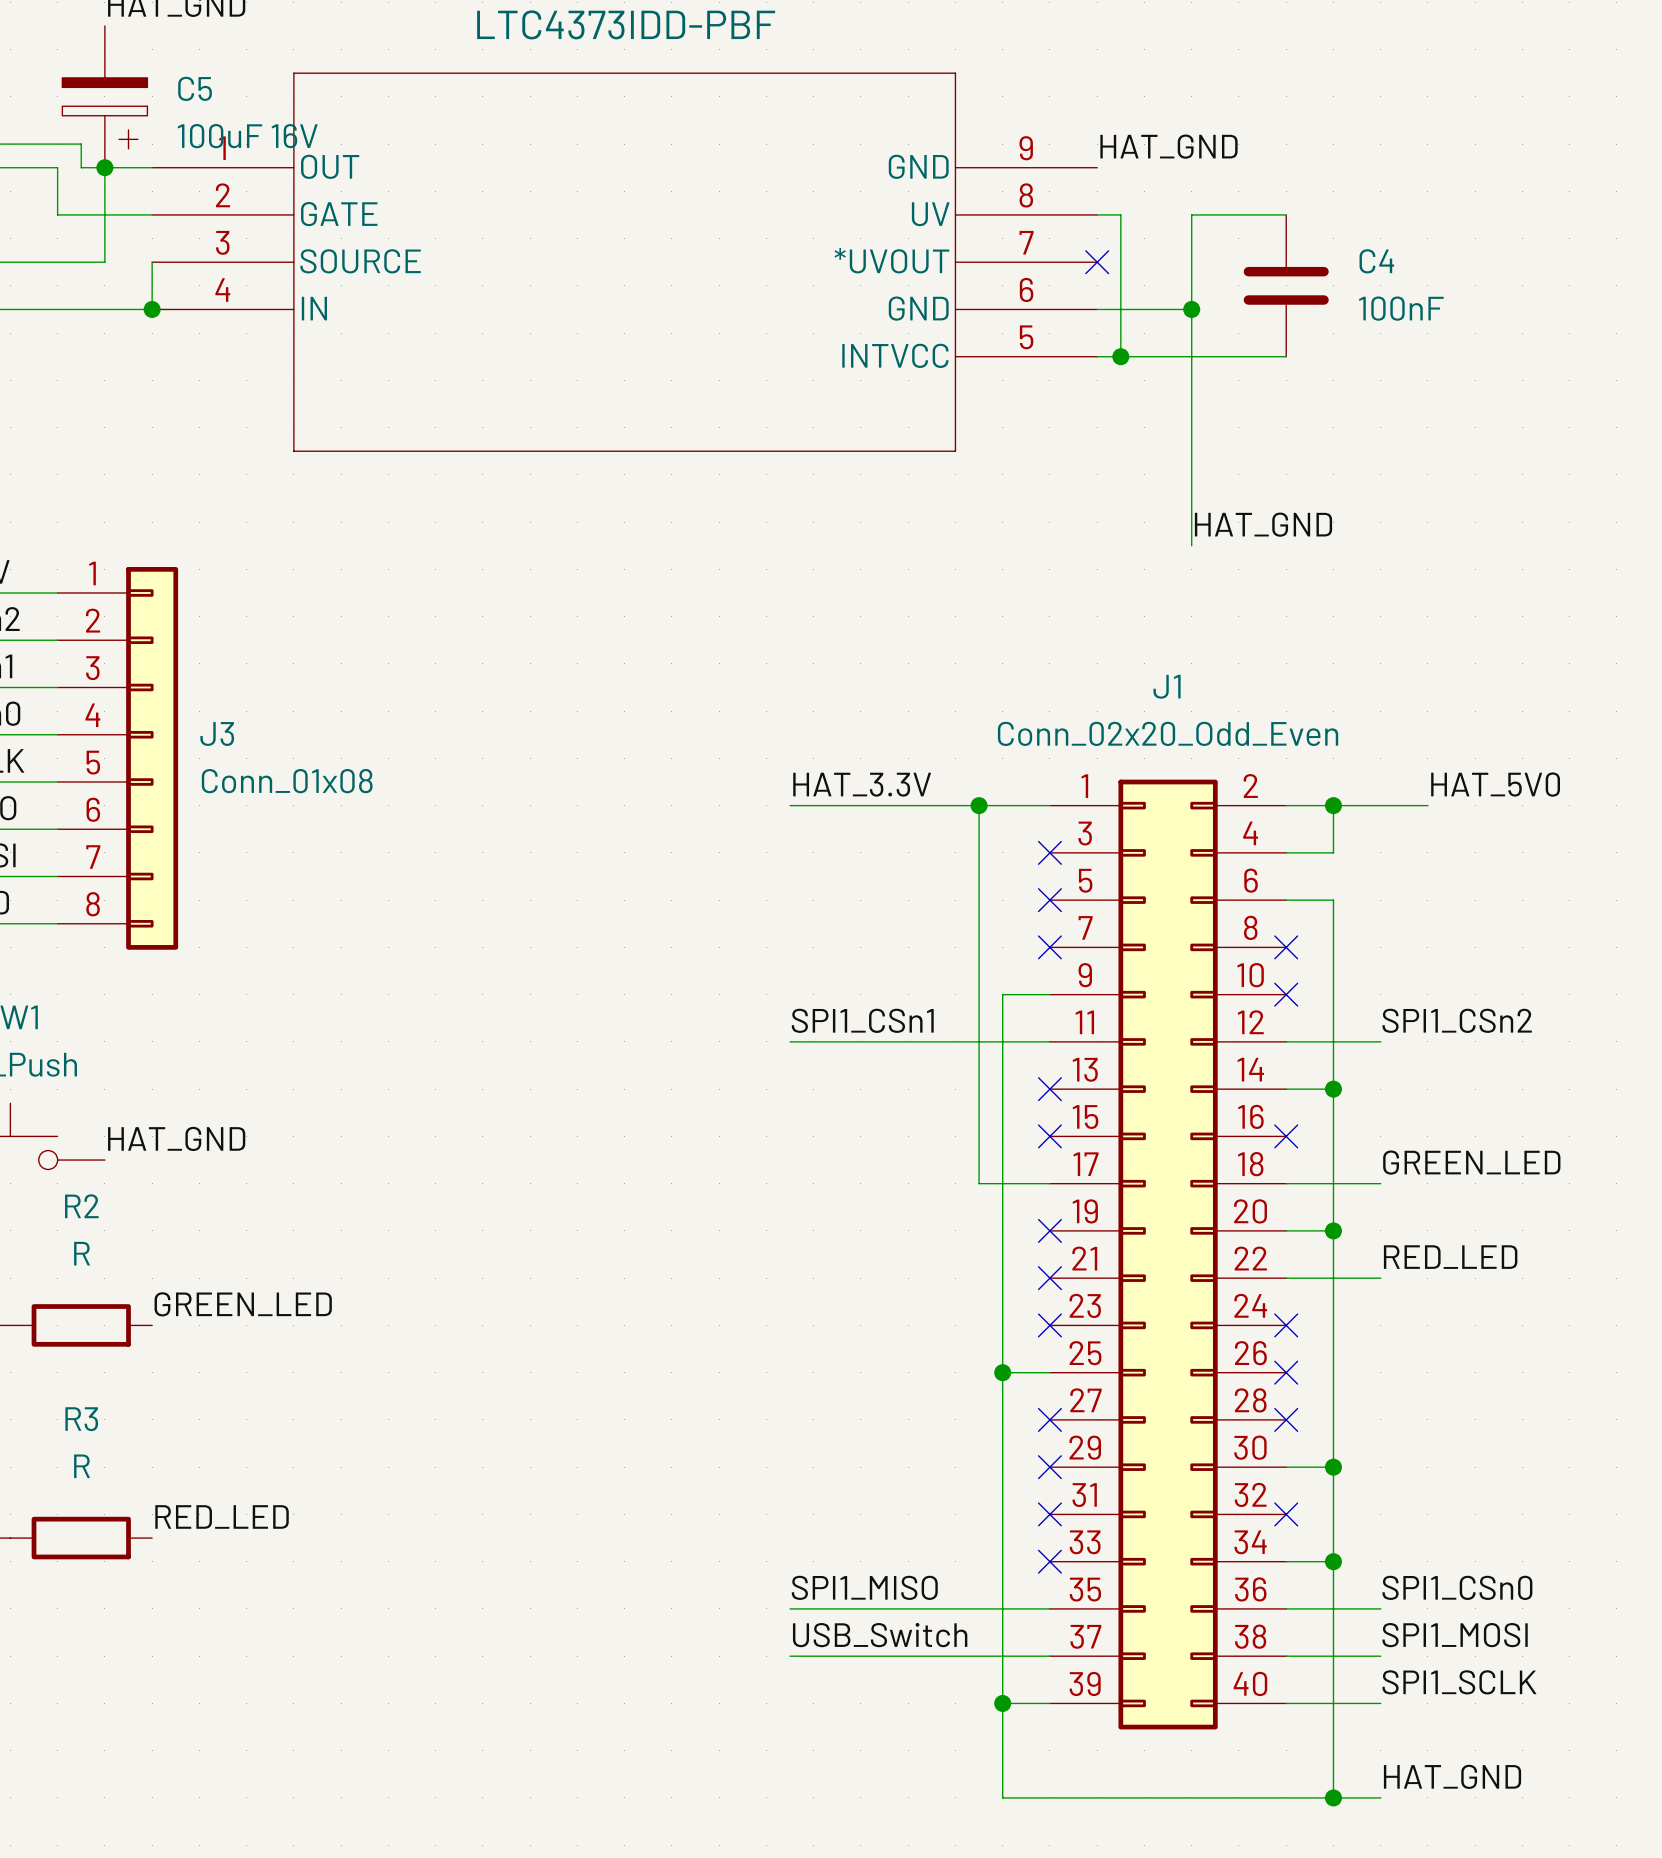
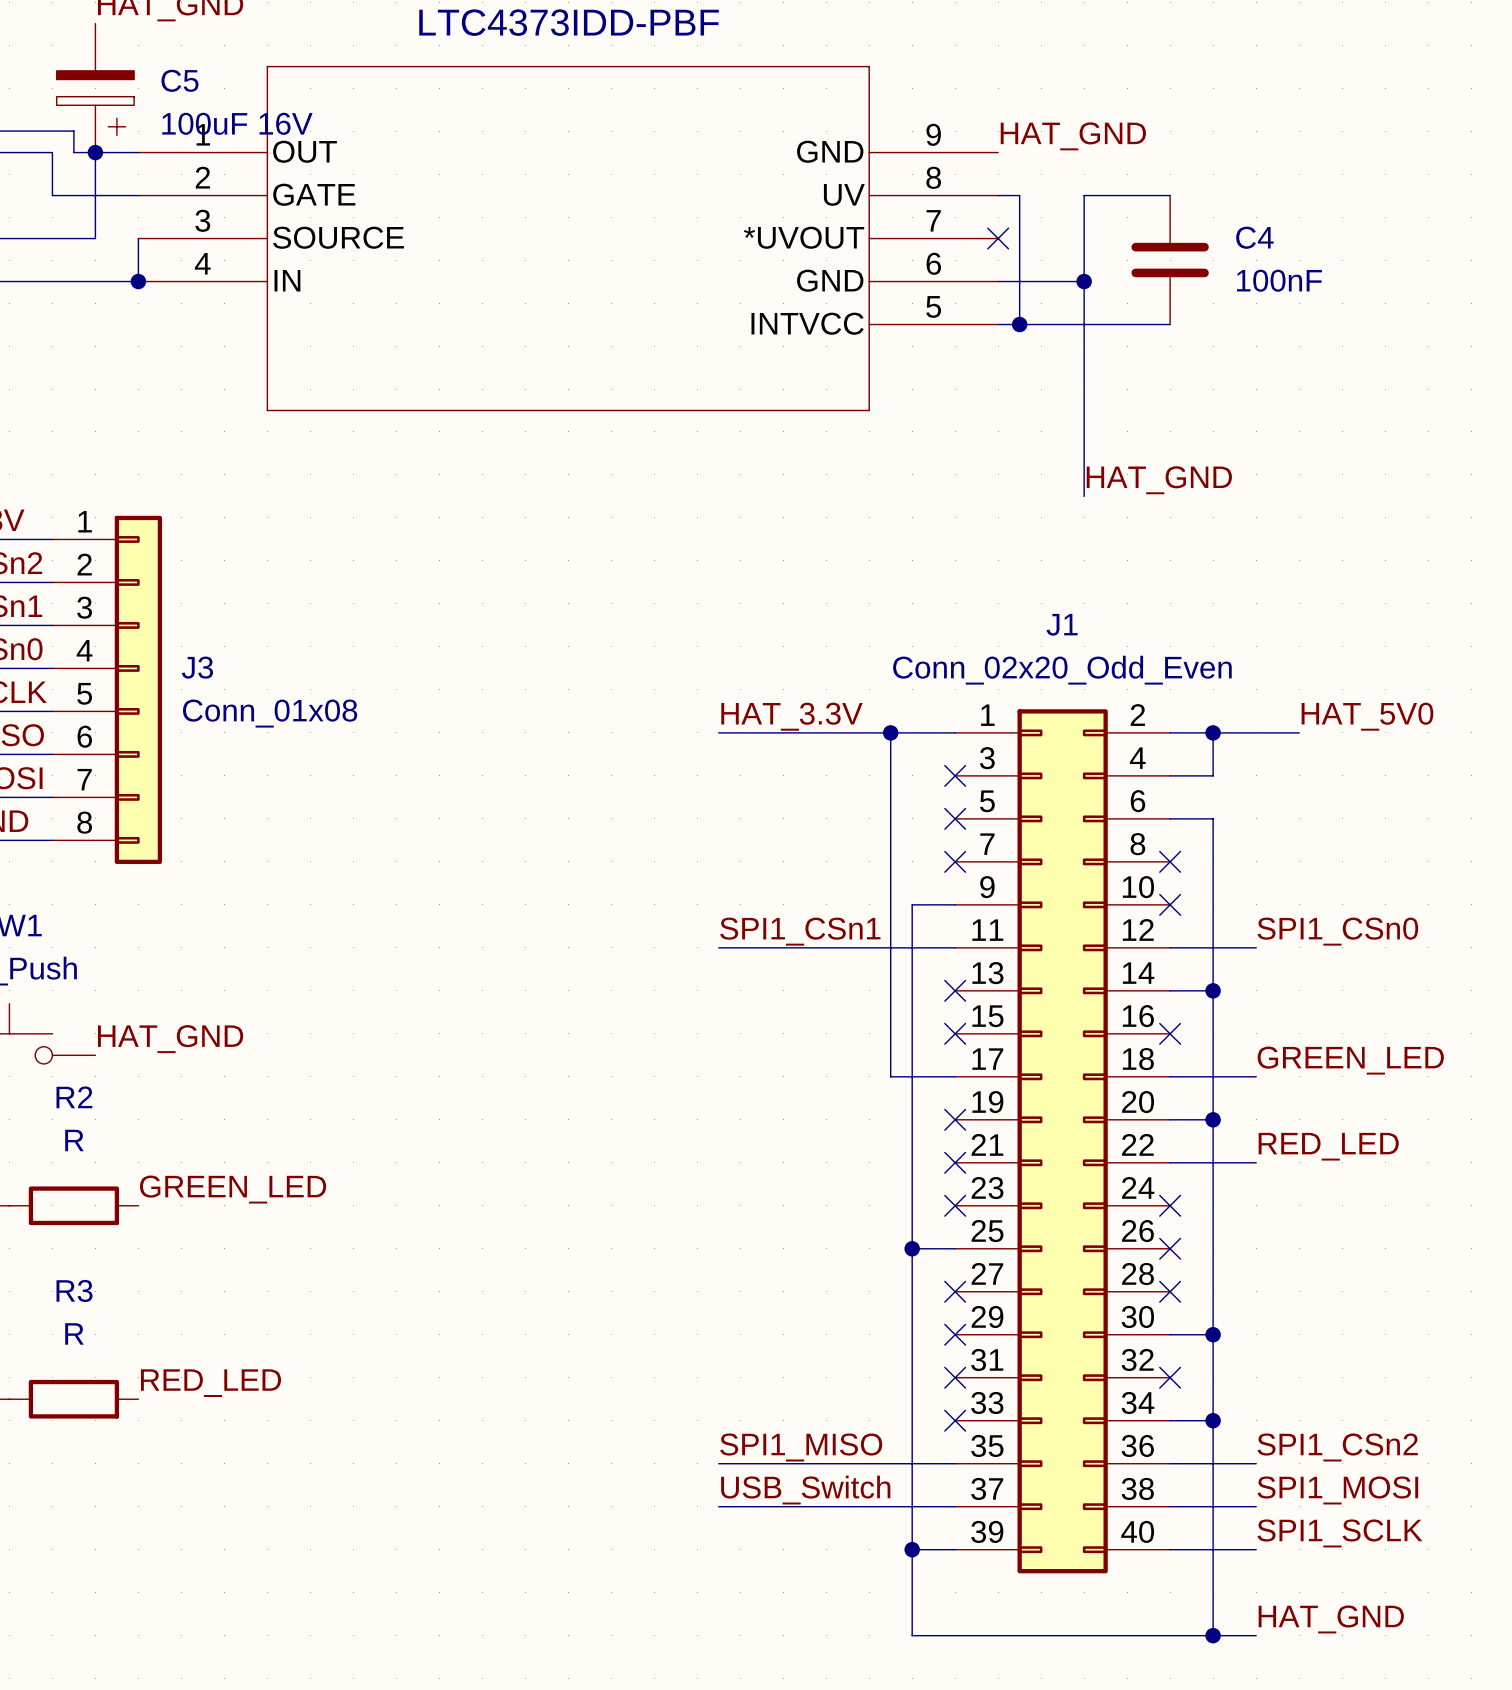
label: SPI1_CSn2 (1457, 1020) -> SPI1_CSn0 (1337, 931)
label: SPI1_CSn0 (1457, 1587) -> SPI1_CSn2 (1337, 1447)

